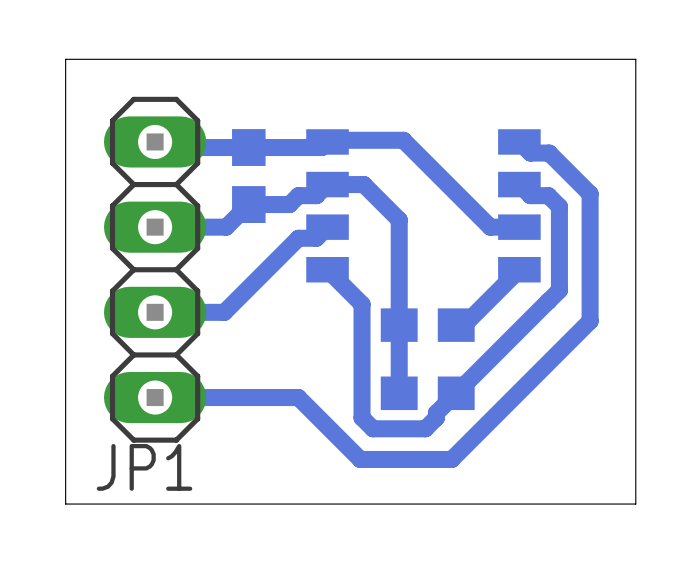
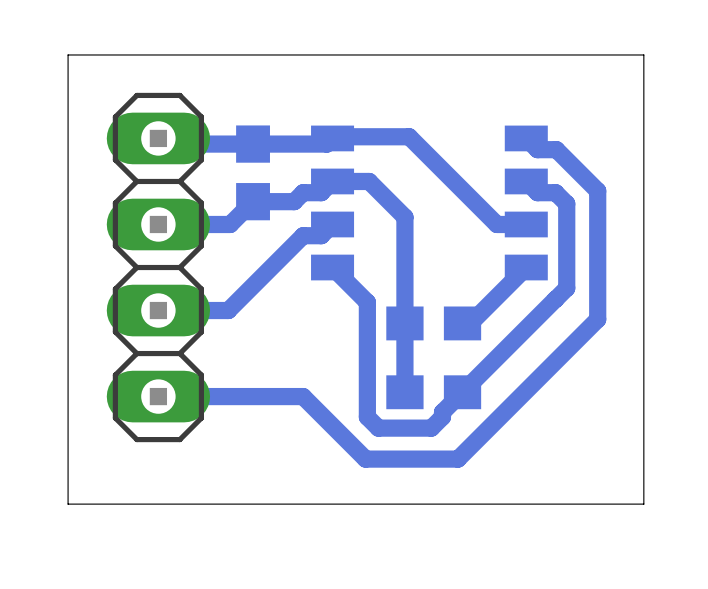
JP1 name: JP1 (144, 467) -> none

